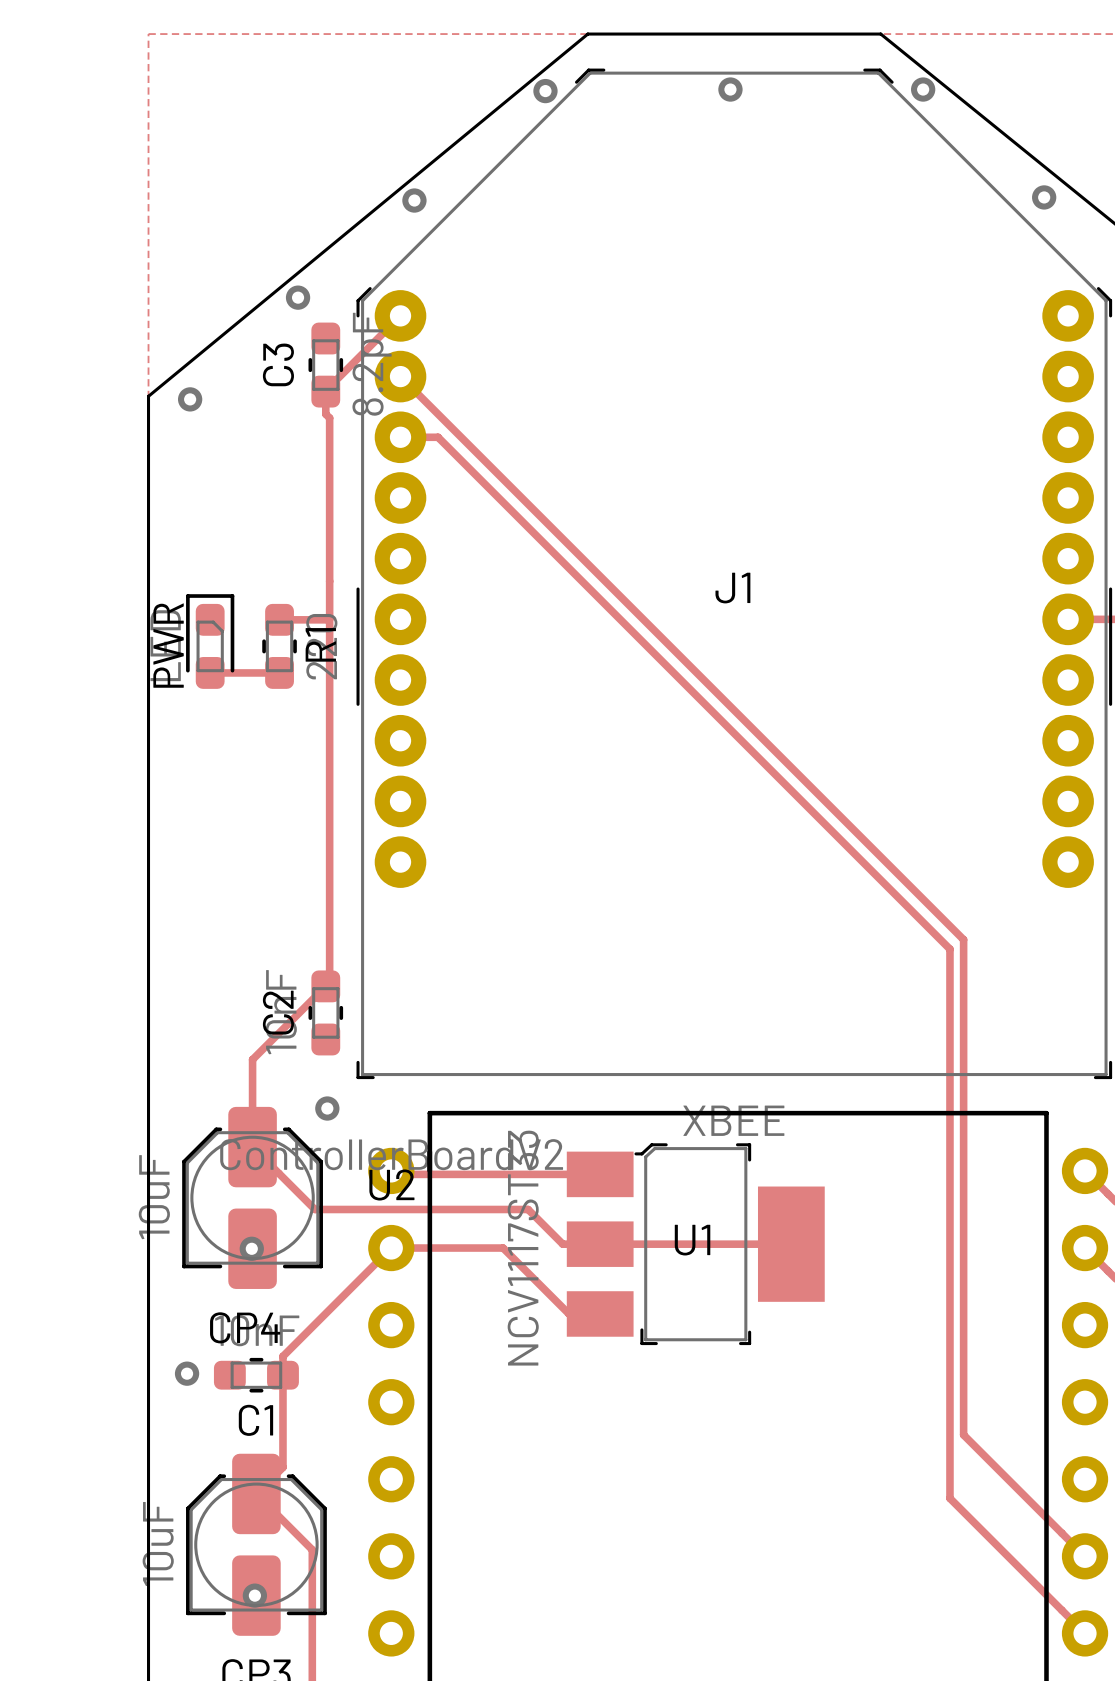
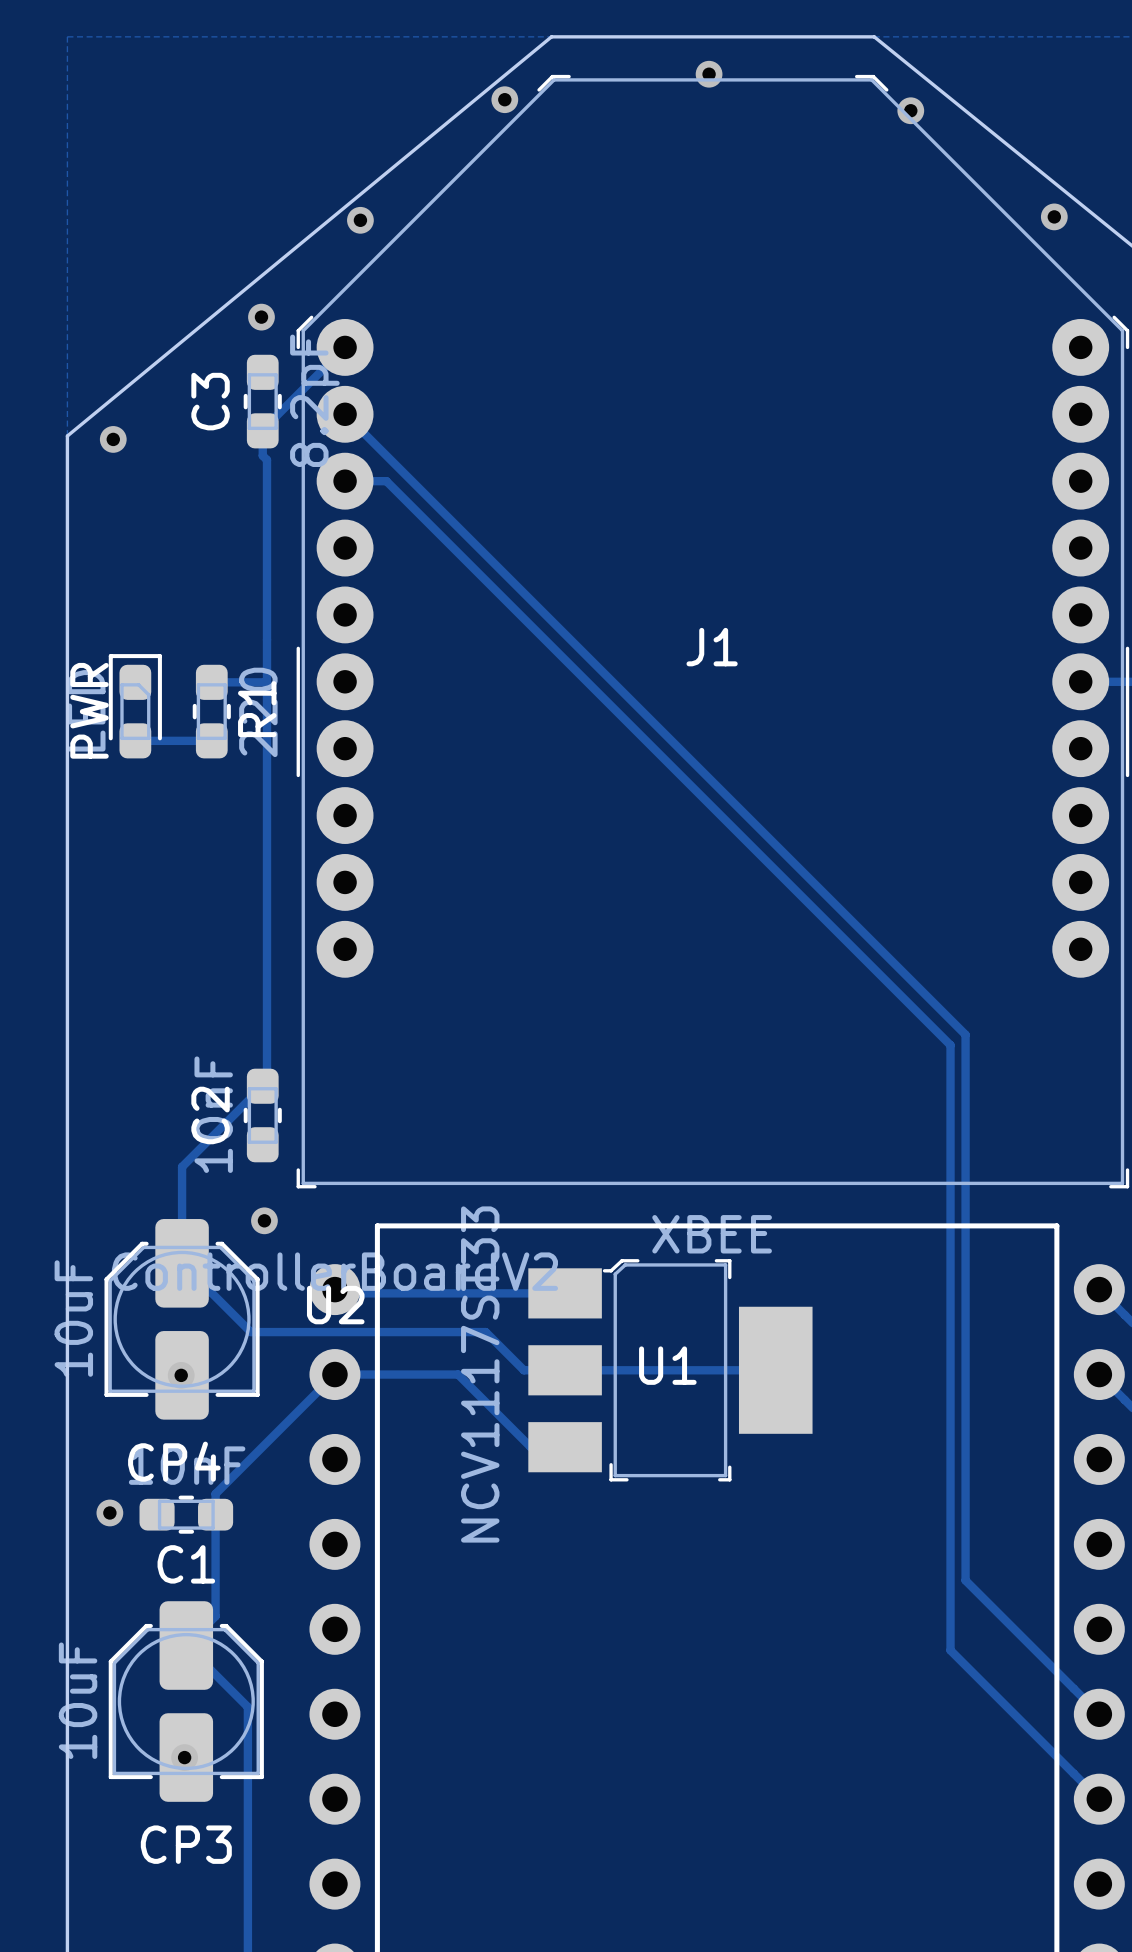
via position: (730, 89) -> (709, 74)
via position: (923, 89) -> (910, 110)
via position: (298, 297) -> (261, 317)

